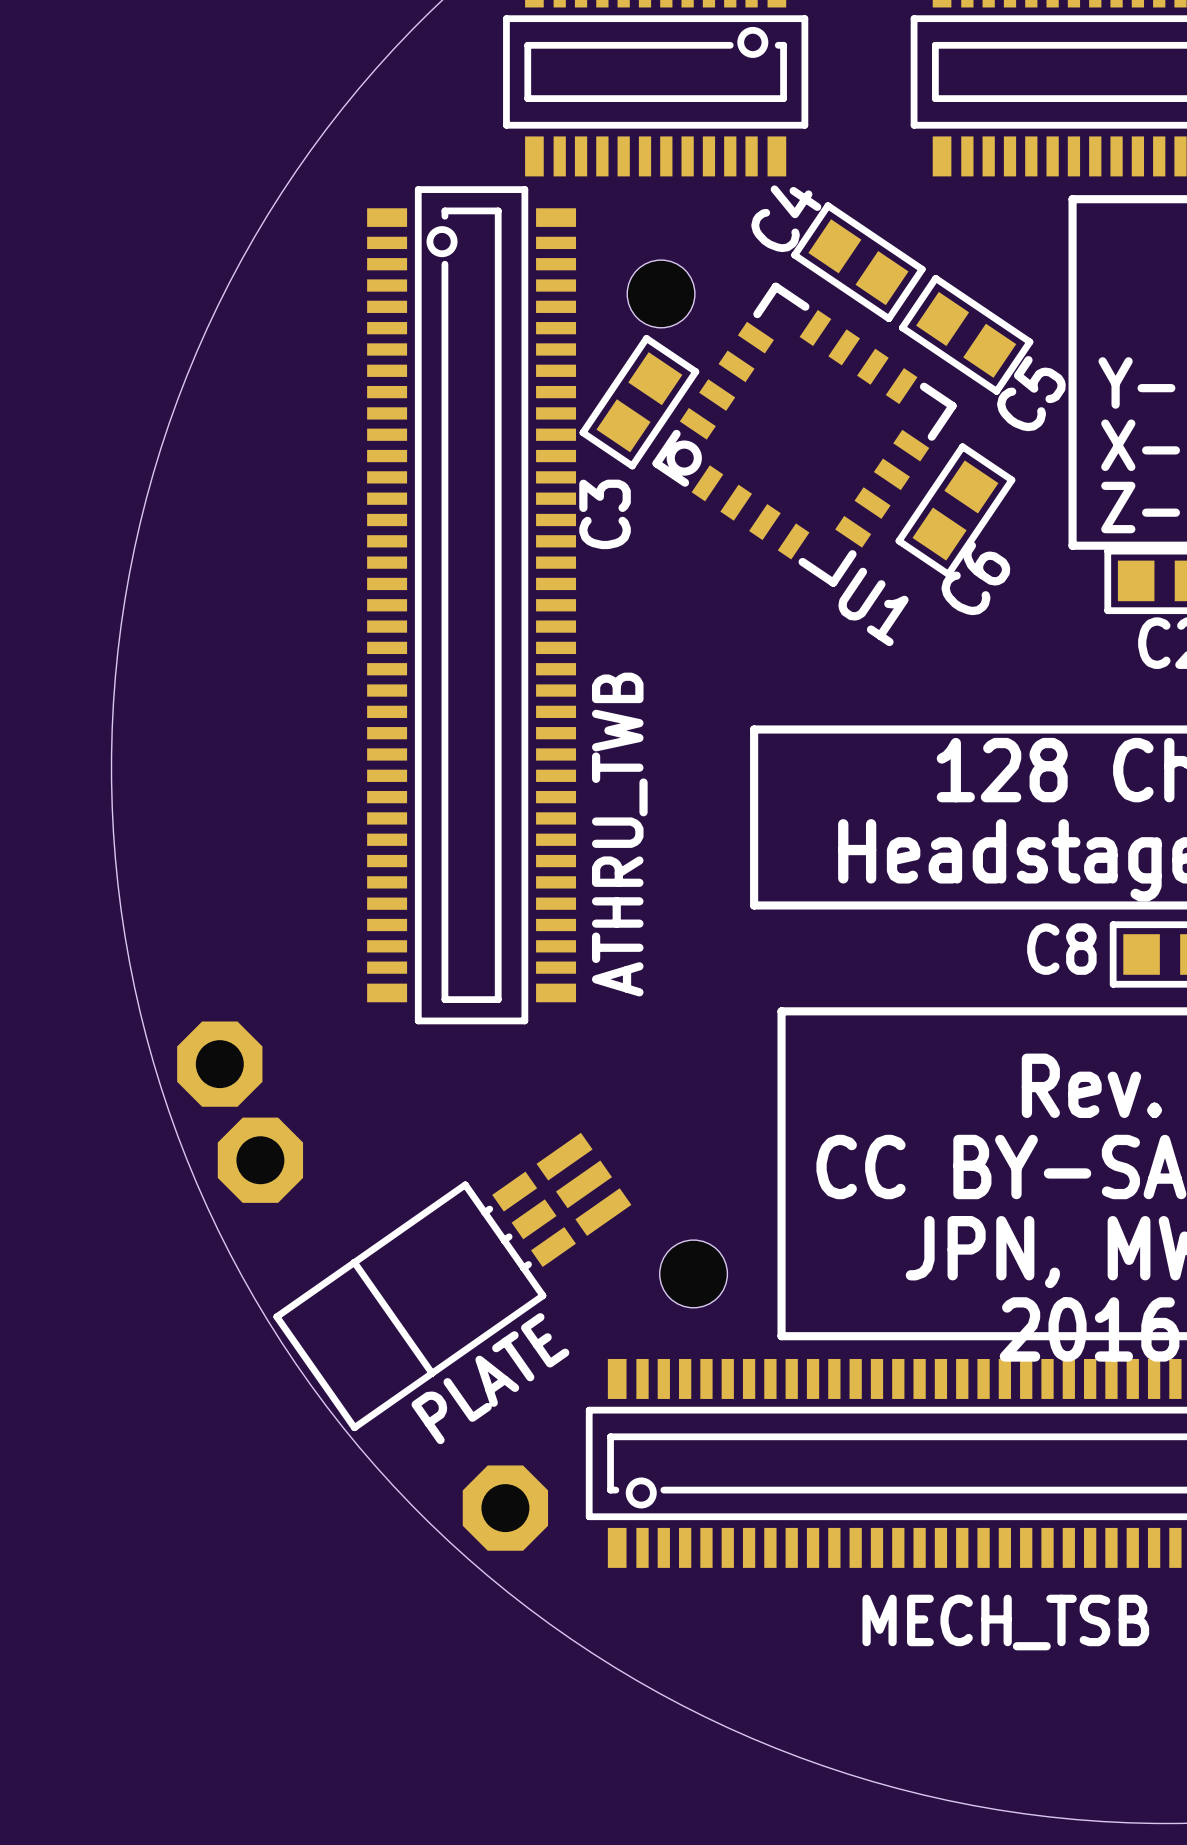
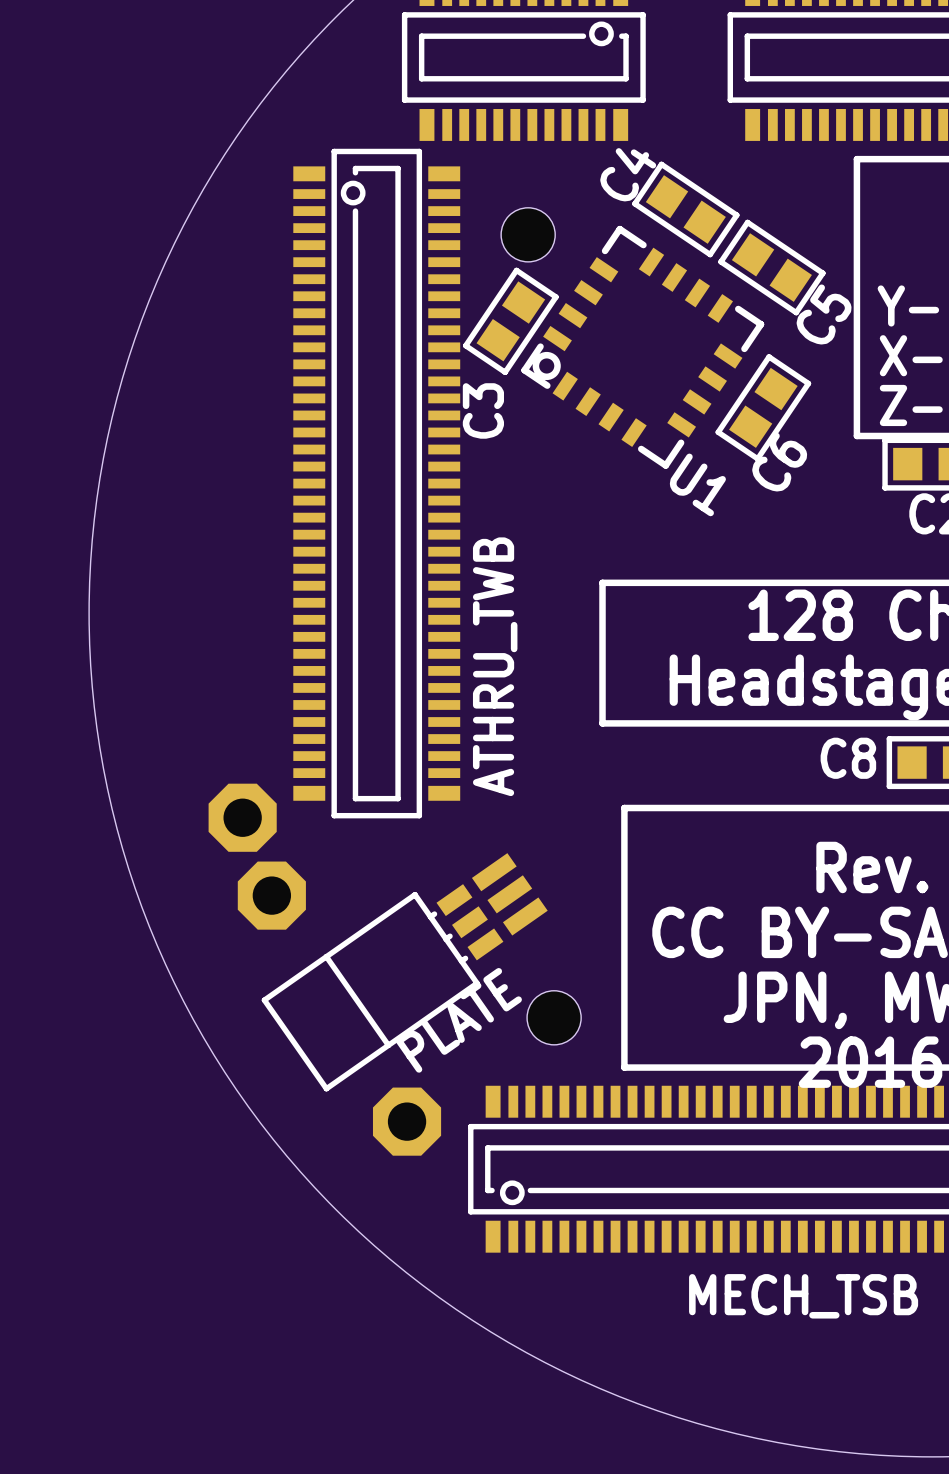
part: none -> (242, 817)
part: (219, 1064) -> none
part: none -> (271, 895)
part: (260, 1160) -> none
PLATE position: (452, 1281) -> (404, 972)
PLATE name position: PLATE (490, 1378) -> PLATE (458, 1020)
part position: (505, 1508) -> (407, 1121)

